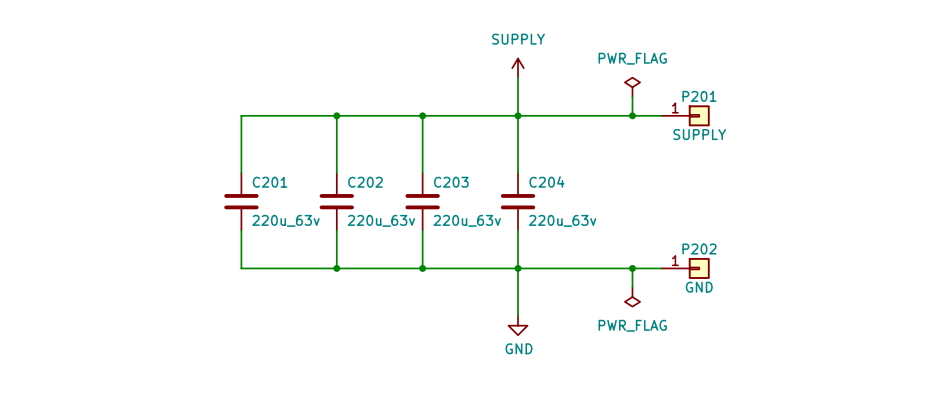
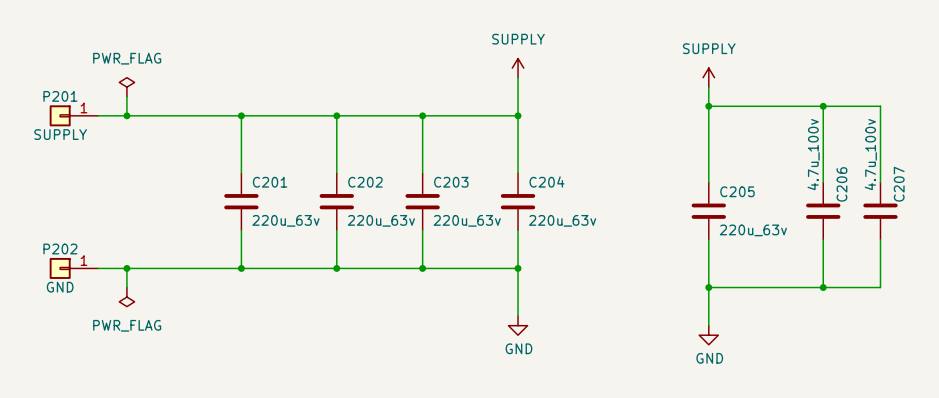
power symbol: none -> SUPPLY (708, 77)
power symbol: none -> PWR_FLAG (126, 87)
power symbol: PWR_FLAG (632, 87) -> none
wire: none -> (708, 87) (708, 182)
wire: none -> (126, 96) (126, 115)
wire: (632, 96) (632, 115) -> none
P201 name position: P201 (699, 96) -> P201 (60, 96)
wire: none -> (708, 106) (880, 106) (880, 182)
junction: none -> (708, 106)
wire: none -> (823, 106) (823, 182)
junction: none -> (823, 106)
wire: none -> (98, 115) (241, 115)
junction: none -> (126, 115)
junction: none -> (241, 115)
wire: (518, 115) (661, 115) -> none
junction: (632, 115) -> none
P201 position: (685, 115) -> (74, 115)
P201 rotation: 0° (699, 115) -> 180° (60, 115)
P201 value position: SUPPLY (699, 134) -> SUPPLY (60, 134)
C205: none -> 220u_63v (708, 211)
C206: none -> 4.7u_100v (823, 211)
C207: none -> 4.7u_100v (880, 211)
wire: none -> (708, 239) (708, 325)
wire: none -> (823, 239) (823, 287)
wire: none -> (880, 239) (880, 287) (708, 287)
P202 name position: P202 (699, 249) -> P202 (60, 249)
wire: none -> (98, 268) (241, 268)
wire: none -> (126, 268) (126, 287)
junction: none -> (126, 268)
junction: none -> (241, 268)
wire: (518, 268) (661, 268) -> none
wire: (632, 268) (632, 287) -> none
junction: (632, 268) -> none
P202 position: (685, 268) -> (74, 268)
P202 rotation: 0° (699, 268) -> 180° (60, 268)
P202 value position: GND (699, 287) -> GND (60, 287)
junction: none -> (708, 287)
junction: none -> (823, 287)
power symbol: none -> PWR_FLAG (126, 297)
power symbol: PWR_FLAG (632, 297) -> none
power symbol: none -> GND (708, 335)

